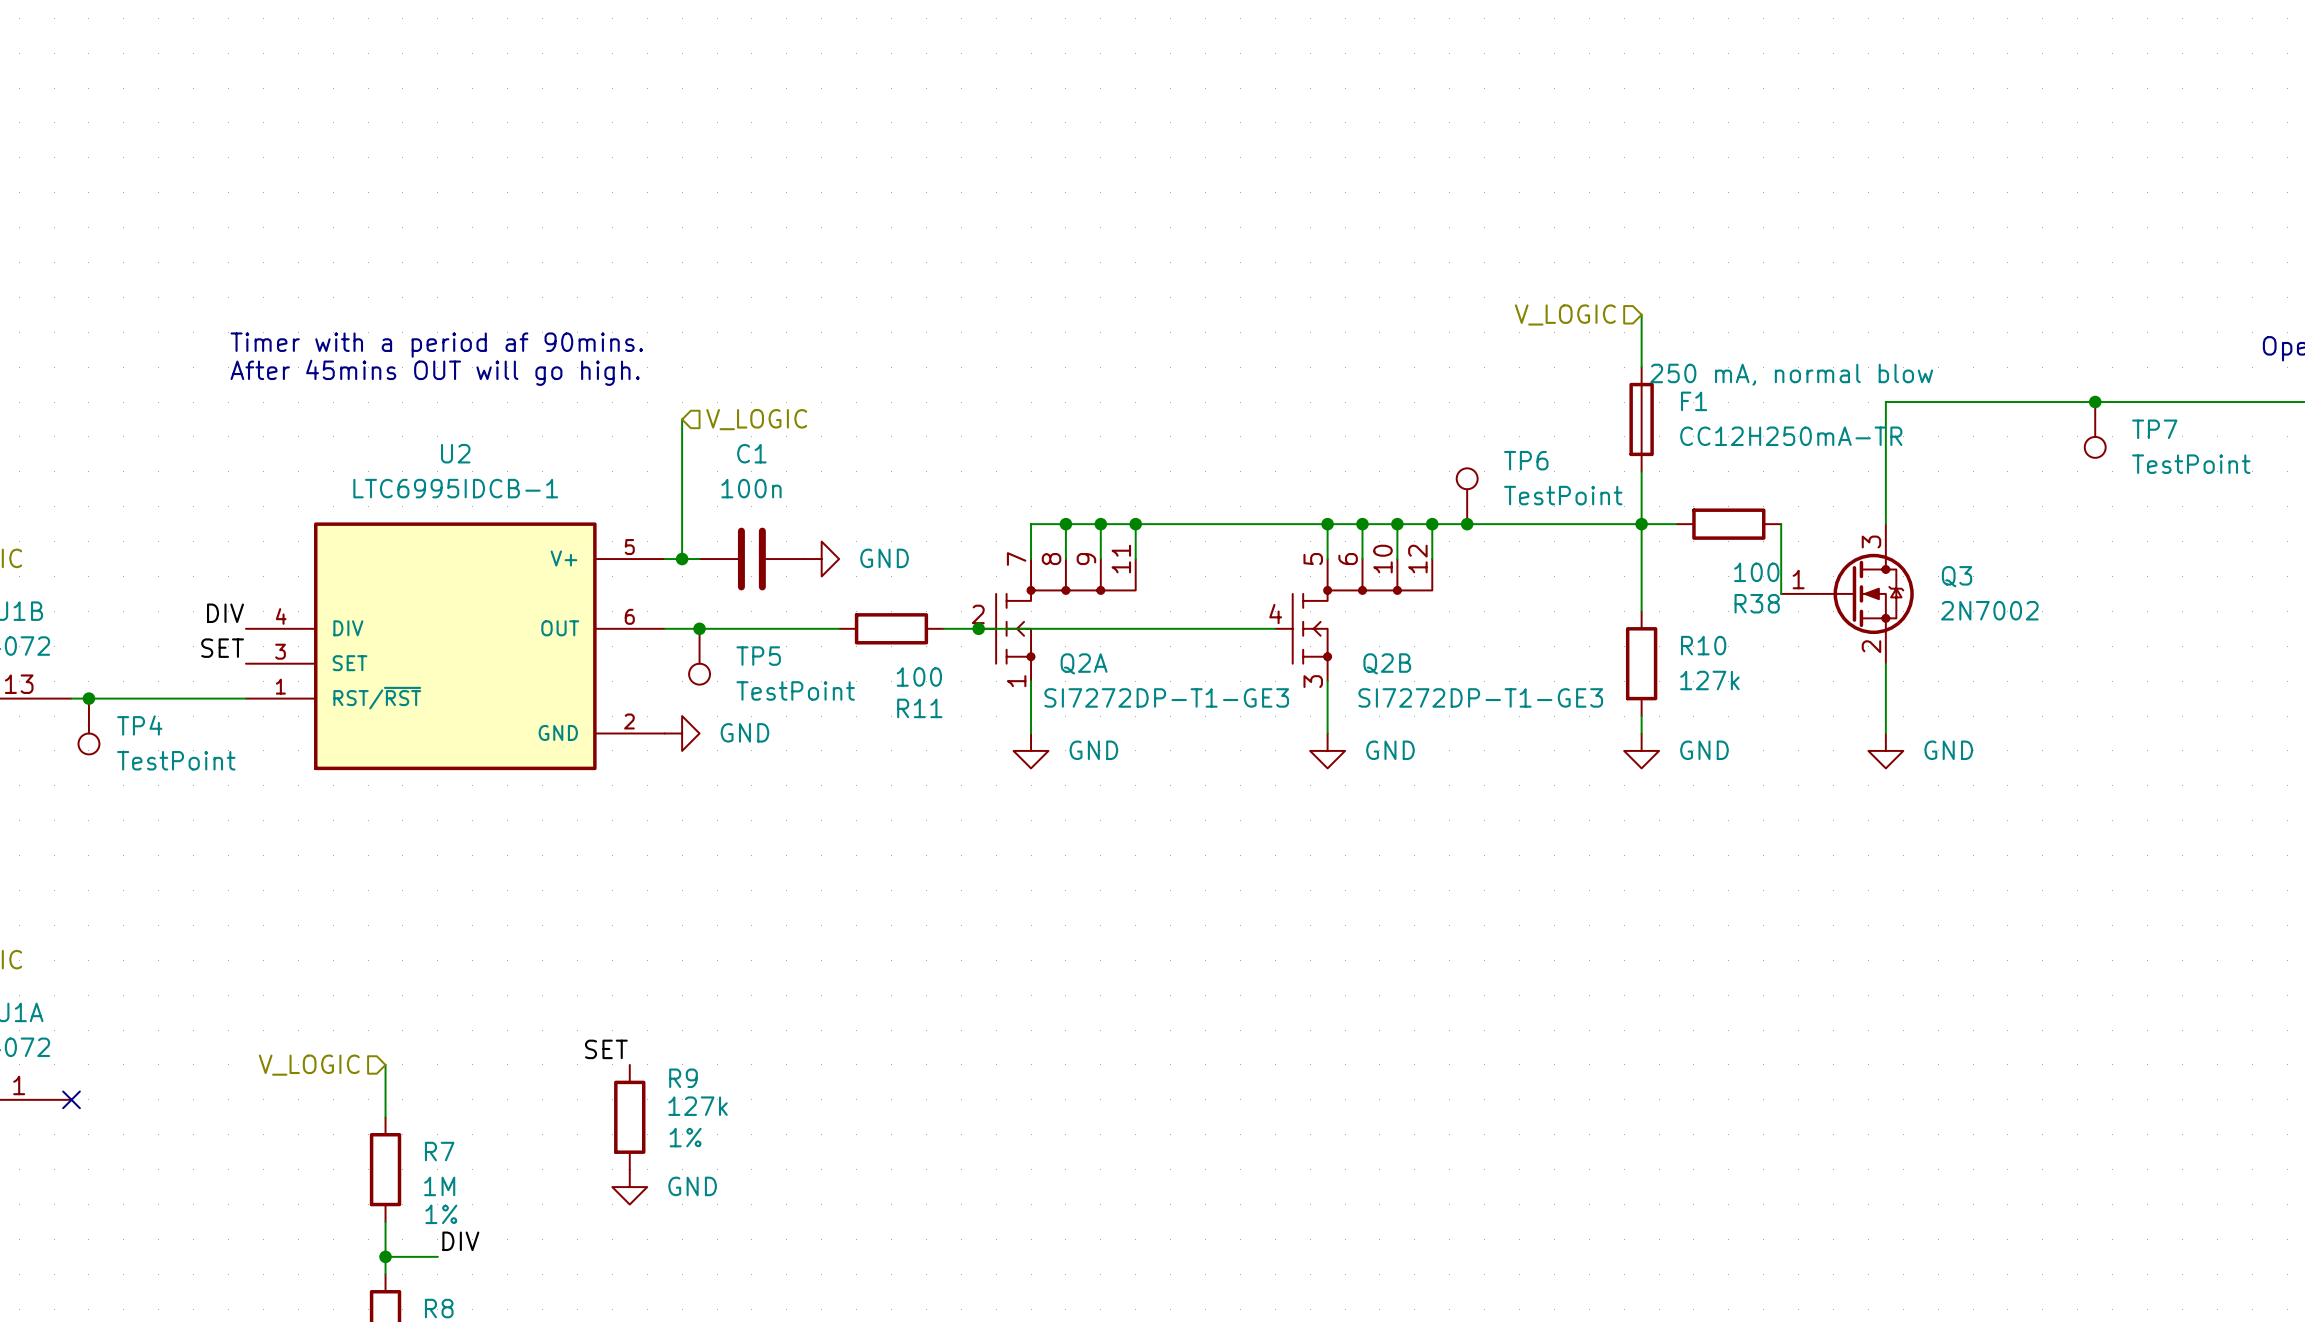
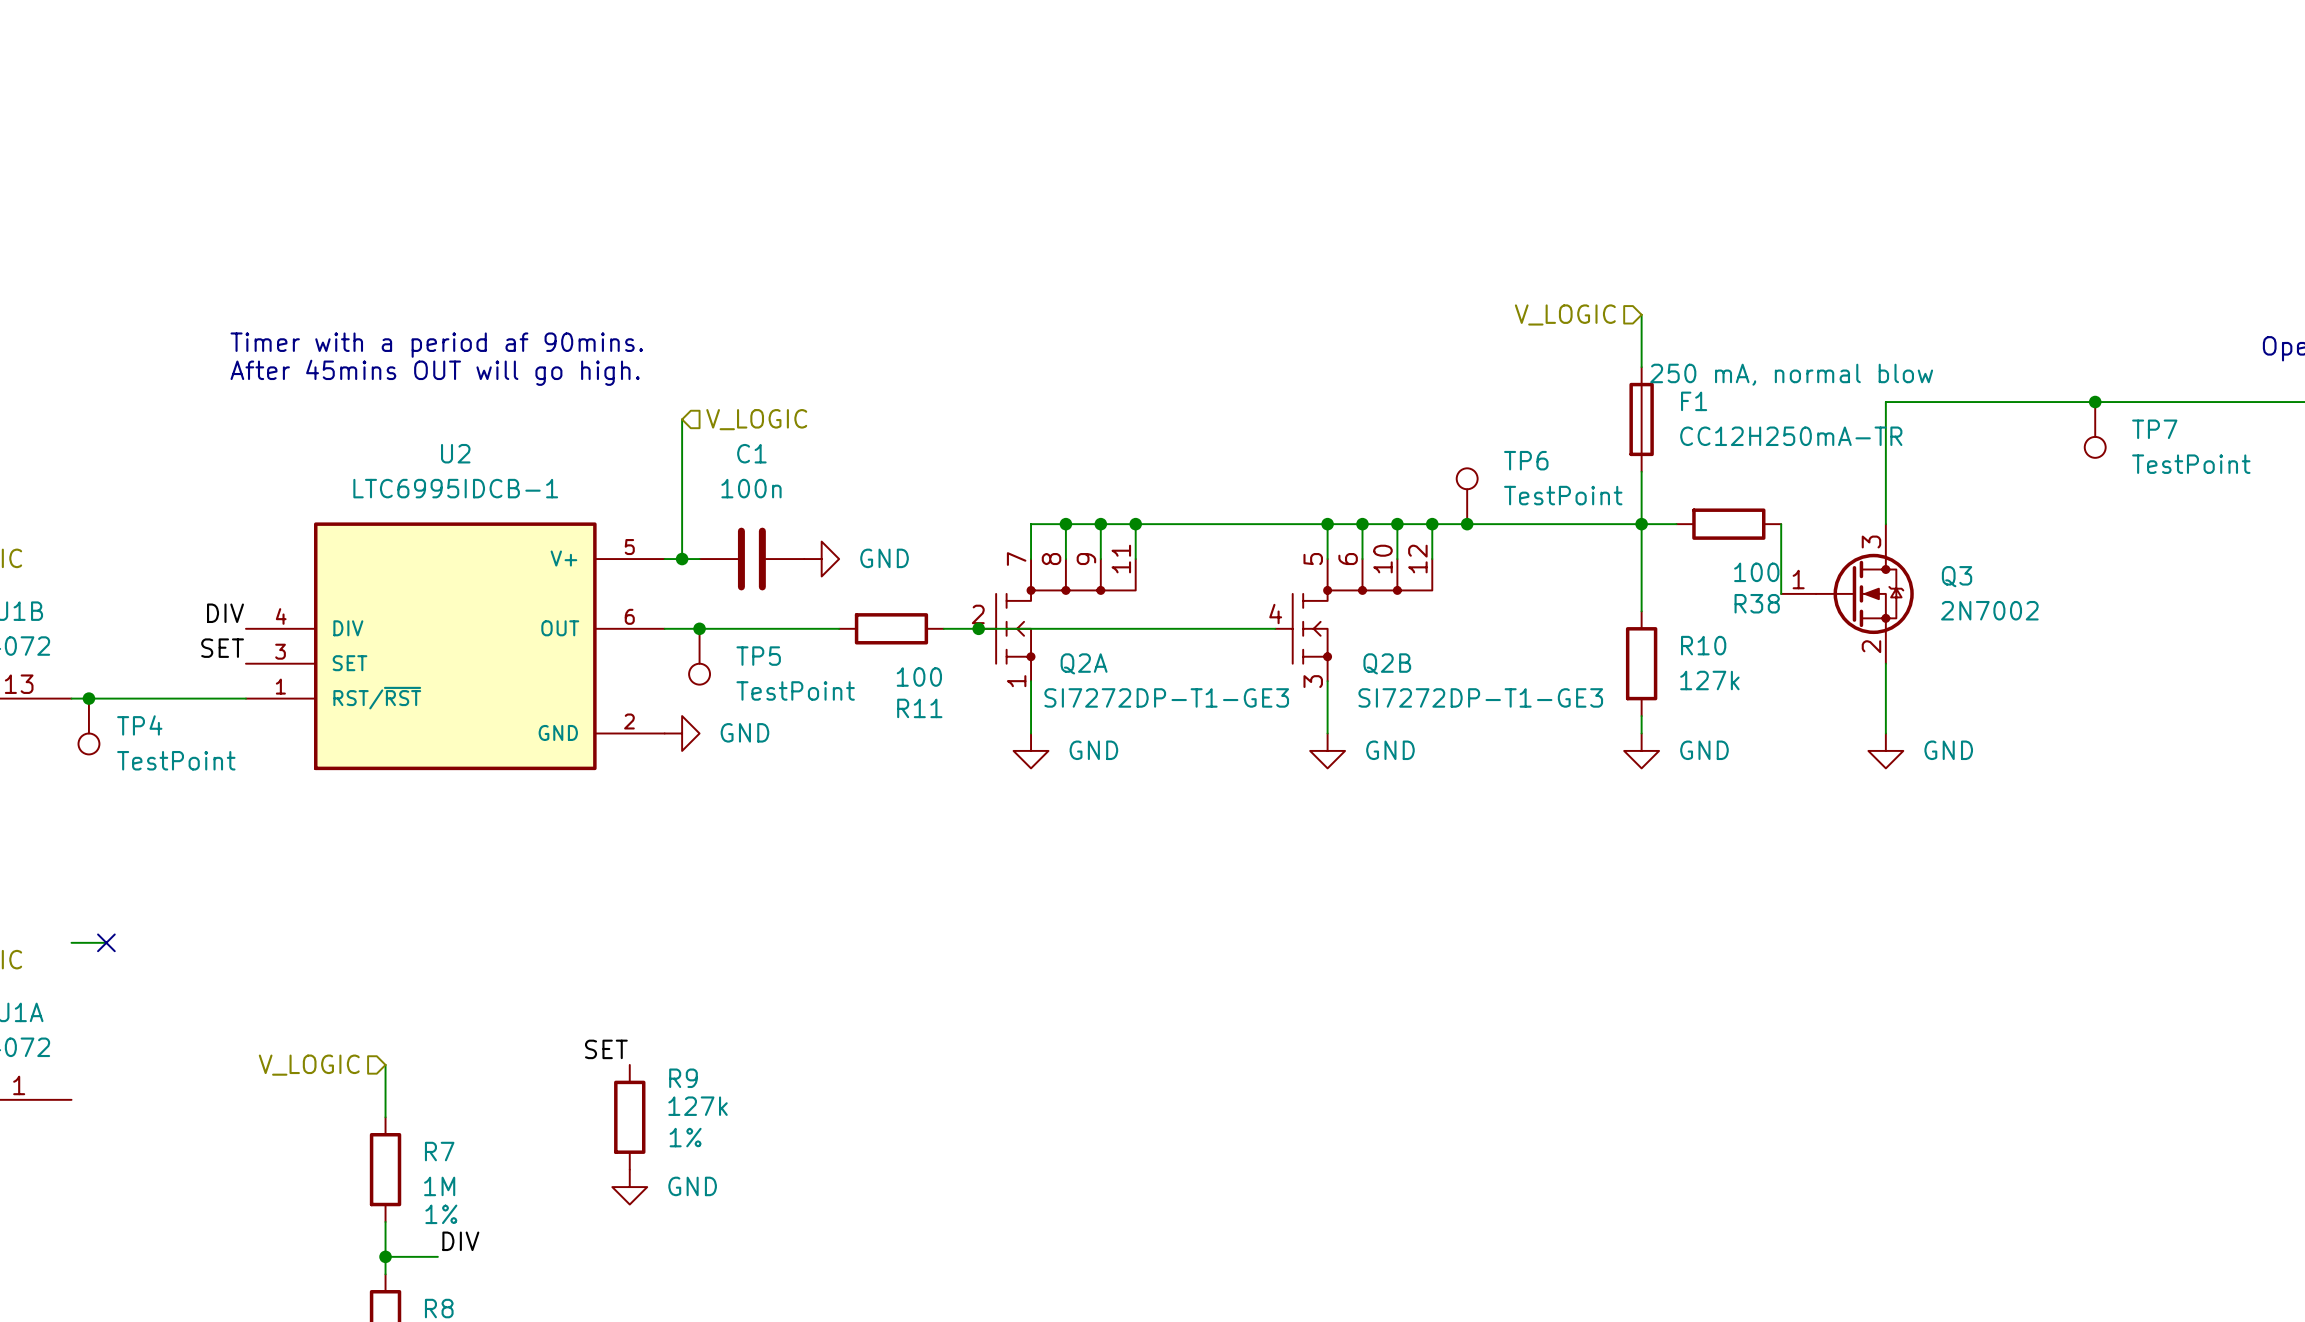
wire: none -> (71, 942) (106, 942)
no-connect mark: none -> (106, 942)
no-connect mark: (71, 1099) -> none

